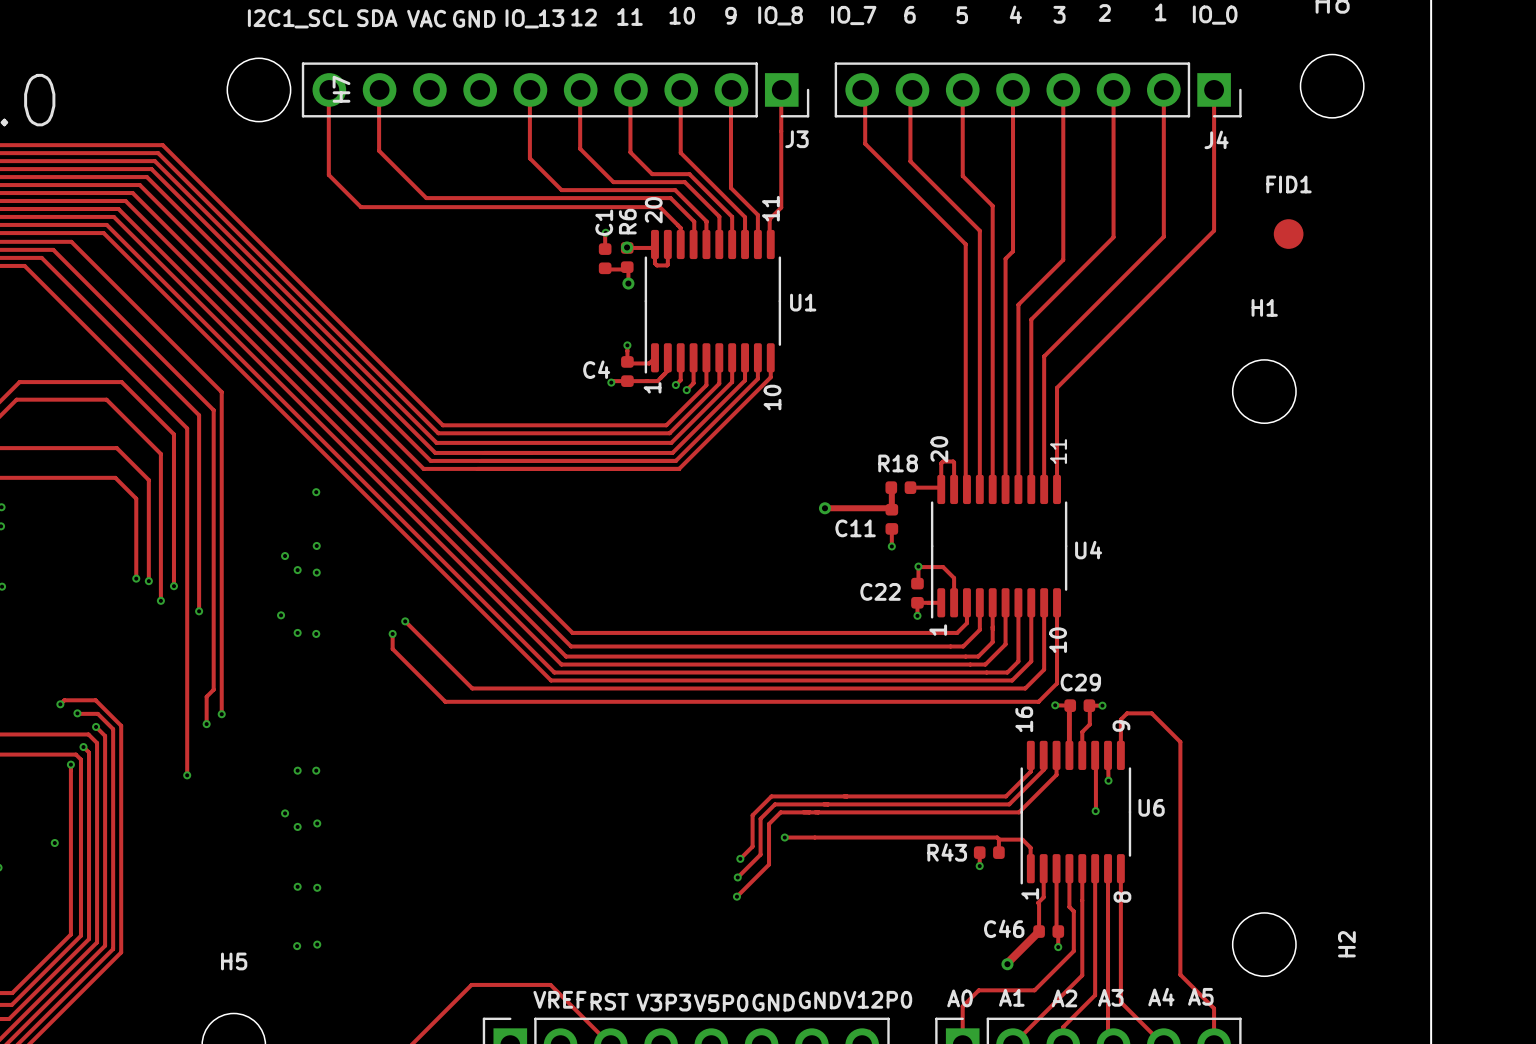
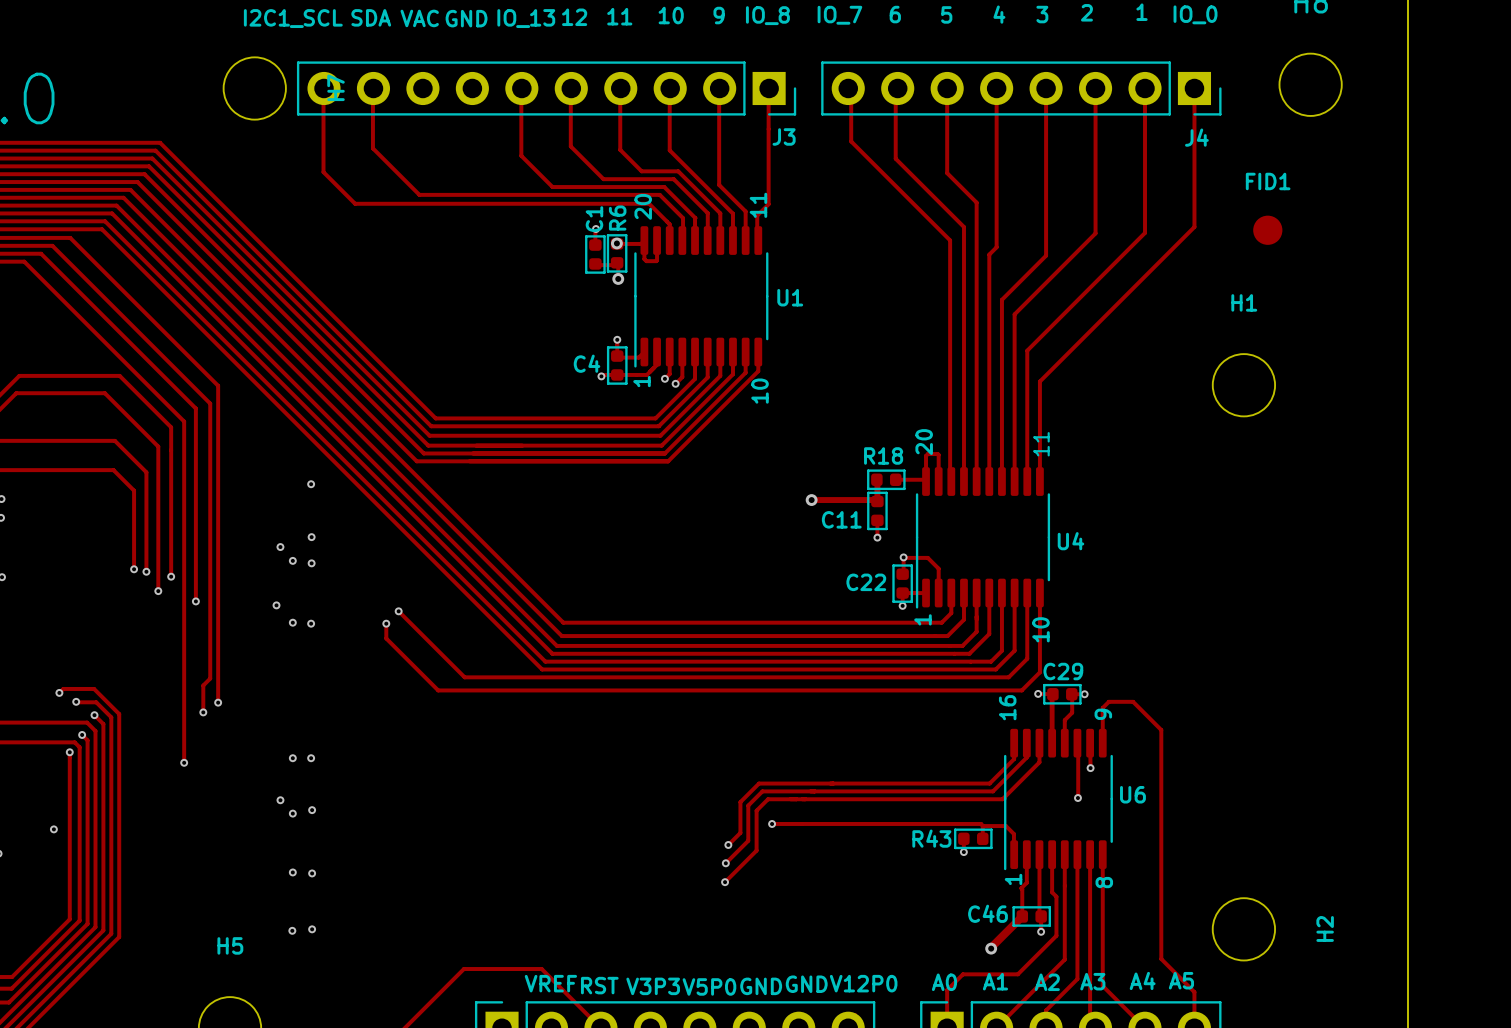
R6 footprint: [620, 242, 634, 273] -> [606, 234, 628, 273]
C1 footprint: [598, 243, 612, 275] -> [585, 235, 606, 274]
C4 footprint: [621, 356, 634, 387] -> [606, 346, 628, 385]
R18 footprint: [885, 481, 917, 494] -> [867, 469, 906, 491]
C11 footprint: [885, 503, 899, 535] -> [867, 491, 888, 531]
C22 footprint: [911, 577, 924, 609] -> [892, 564, 913, 603]
C29 footprint: [1064, 699, 1096, 712] -> [1043, 683, 1082, 705]
R43 footprint: [973, 846, 1005, 859] -> [954, 828, 993, 850]
C46 footprint: [1033, 925, 1065, 938] -> [1012, 906, 1052, 927]

